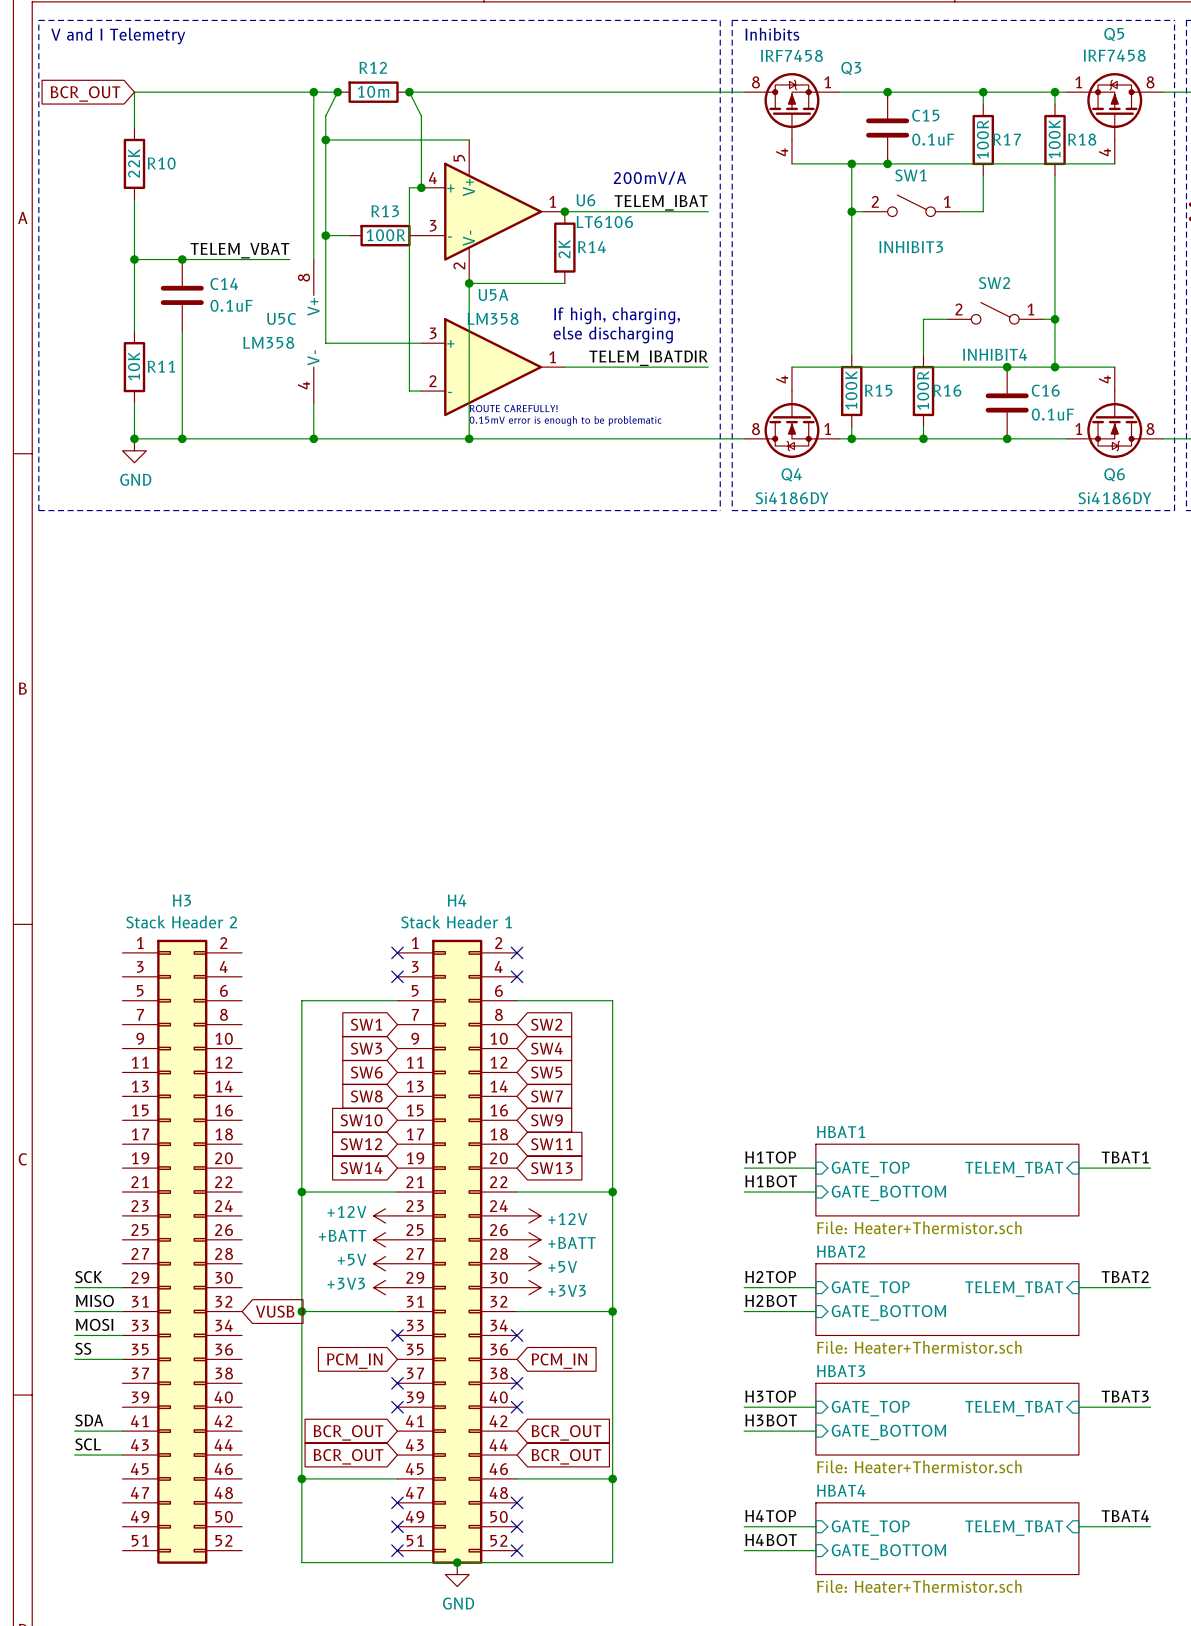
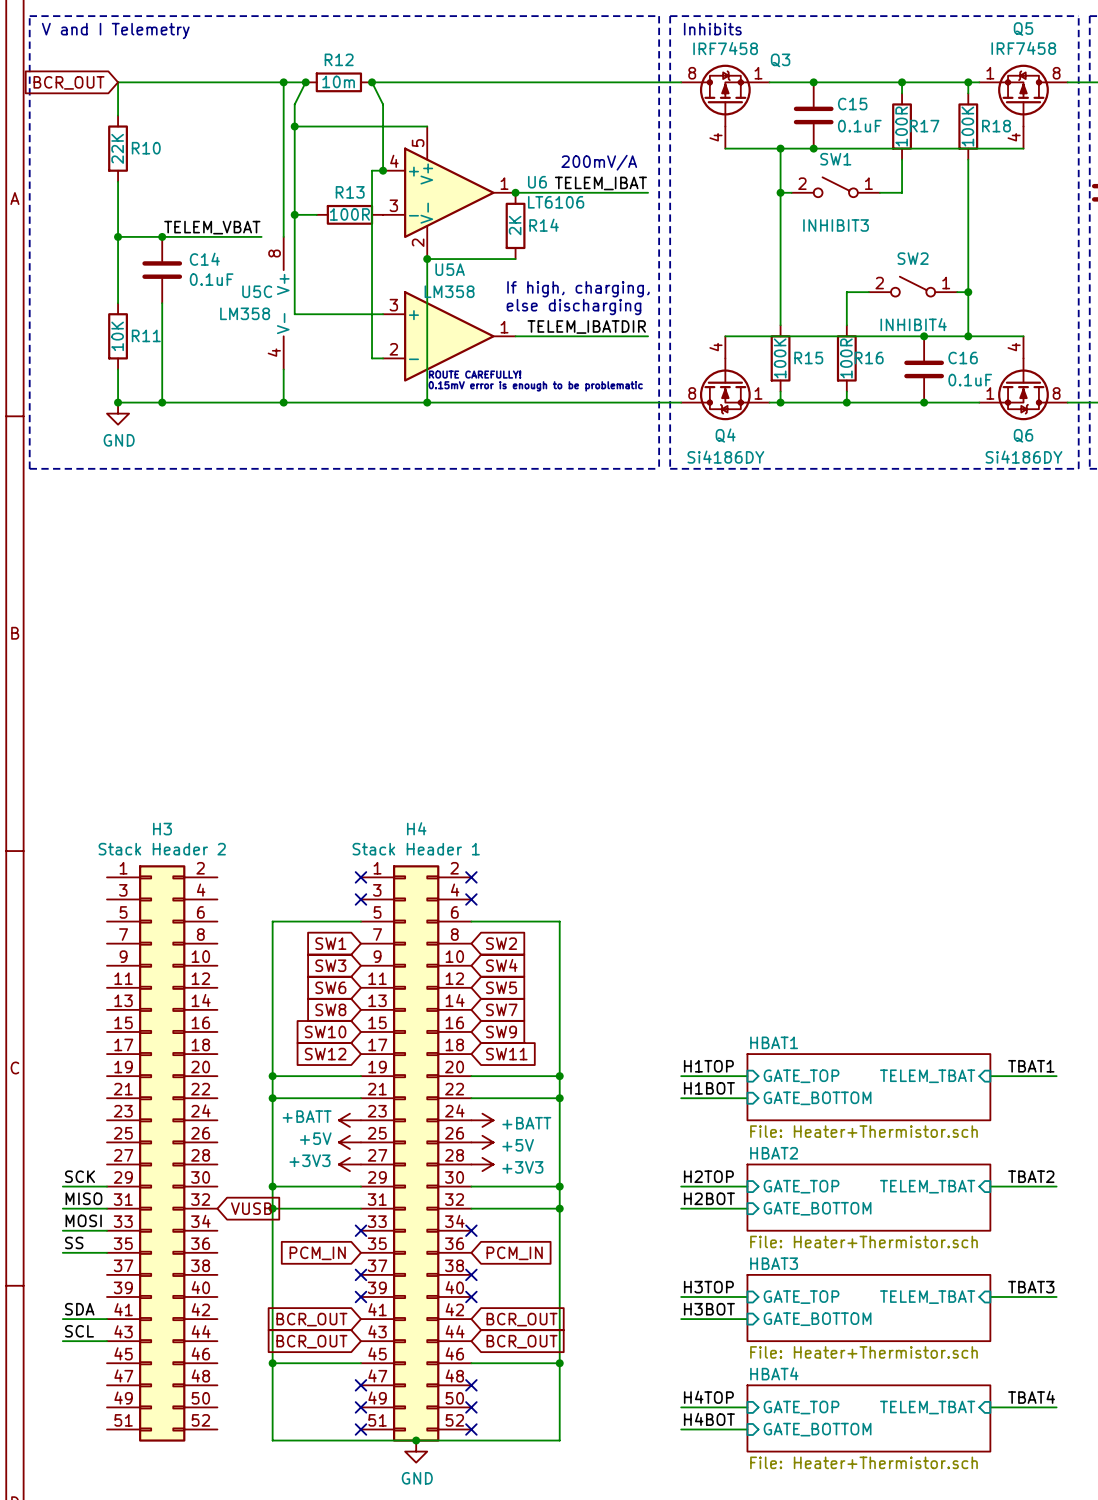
wire: none -> (272, 1076) (360, 1076)
junction: none -> (272, 1076)
global label: SW14 (361, 1168) -> none
wire: none -> (471, 1076) (559, 1076)
global label: SW13 (551, 1168) -> none
junction: none -> (559, 1076)
power symbol: +12V (385, 1215) -> +BATT (349, 1120)
power symbol: +12V (528, 1215) -> +BATT (482, 1120)
power symbol: +BATT (385, 1239) -> +5V (349, 1142)
power symbol: +BATT (528, 1239) -> +5V (482, 1142)
power symbol: +5V (385, 1263) -> +3V3 (349, 1164)
power symbol: +5V (528, 1263) -> +3V3 (482, 1164)
wire: none -> (272, 1186) (360, 1186)
junction: none -> (272, 1186)
power symbol: +3V3 (385, 1287) -> none
wire: none -> (471, 1186) (559, 1186)
power symbol: +3V3 (528, 1287) -> none
junction: none -> (559, 1186)

